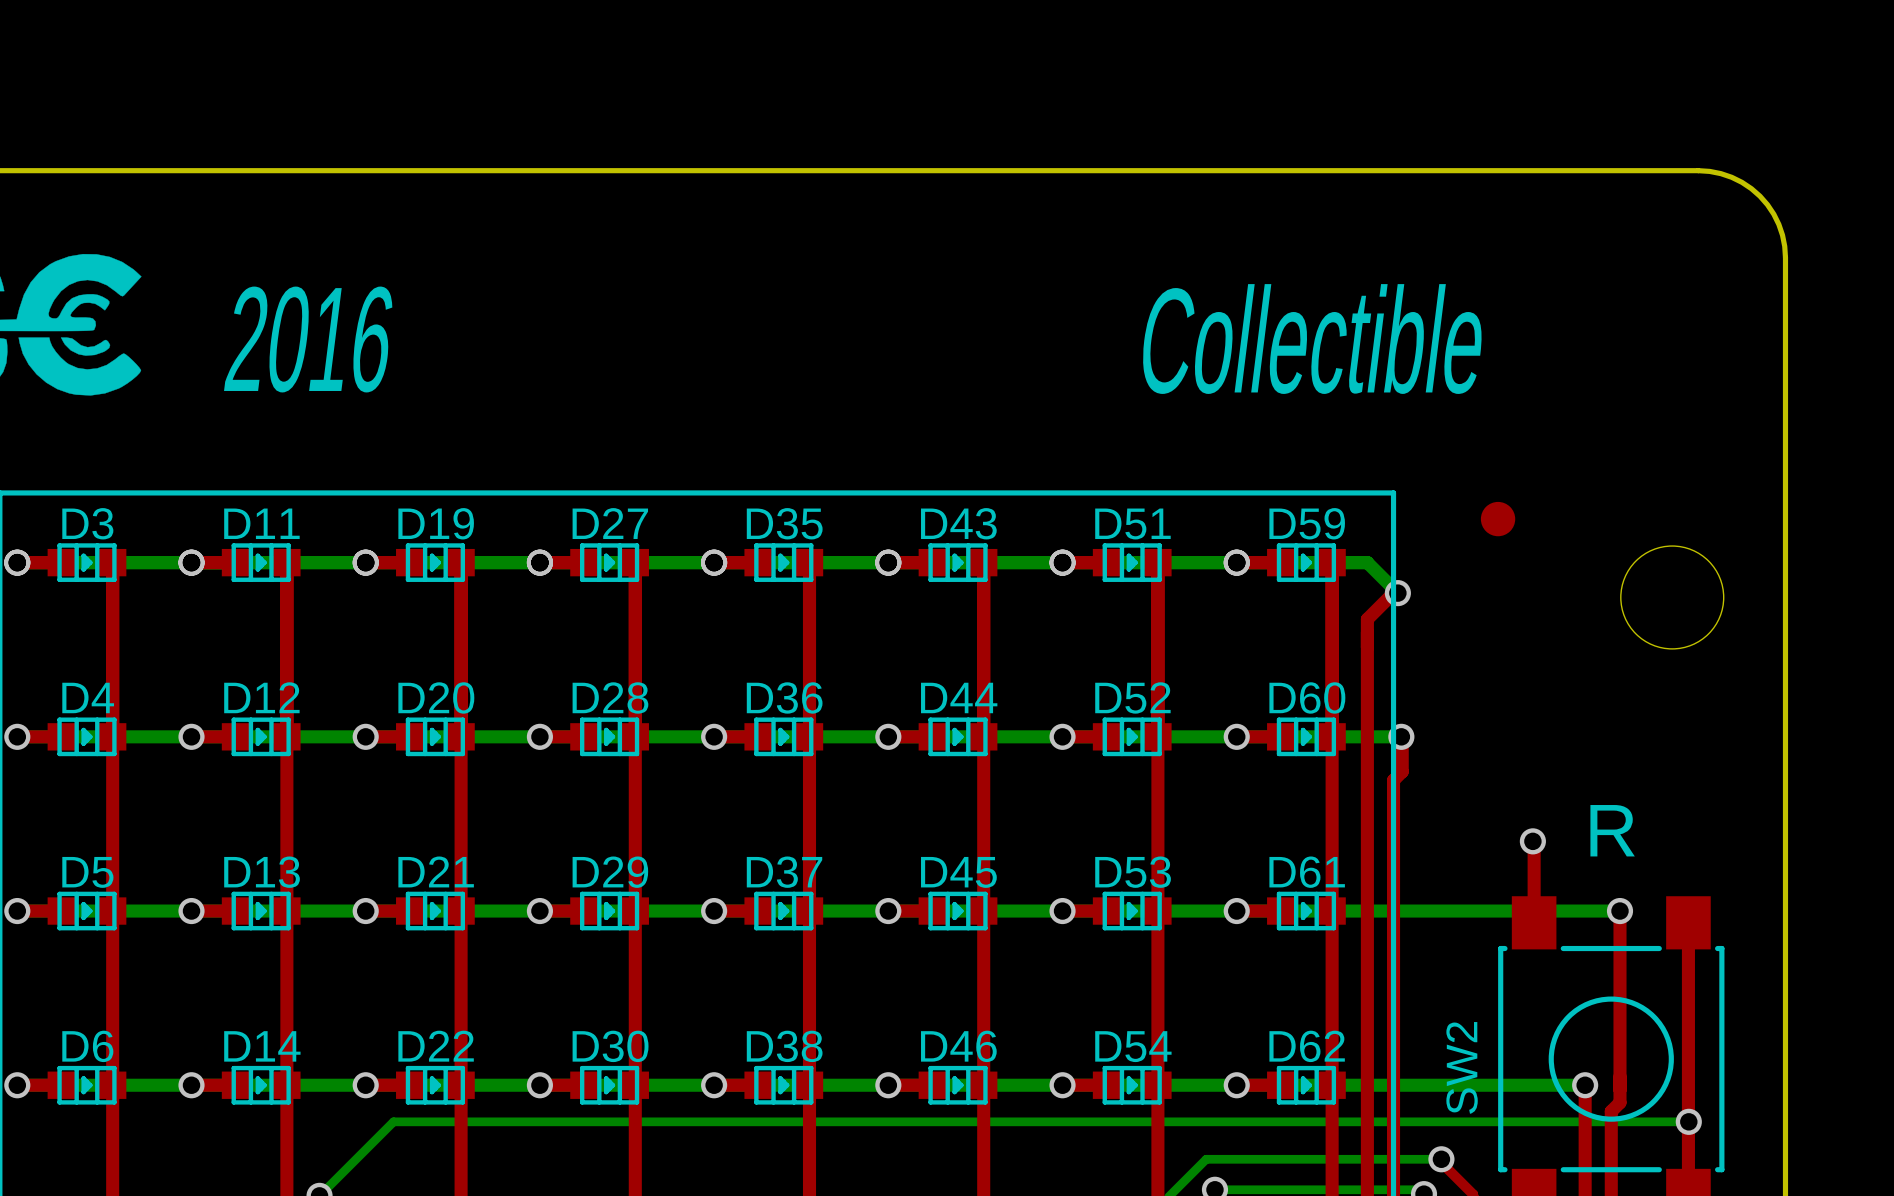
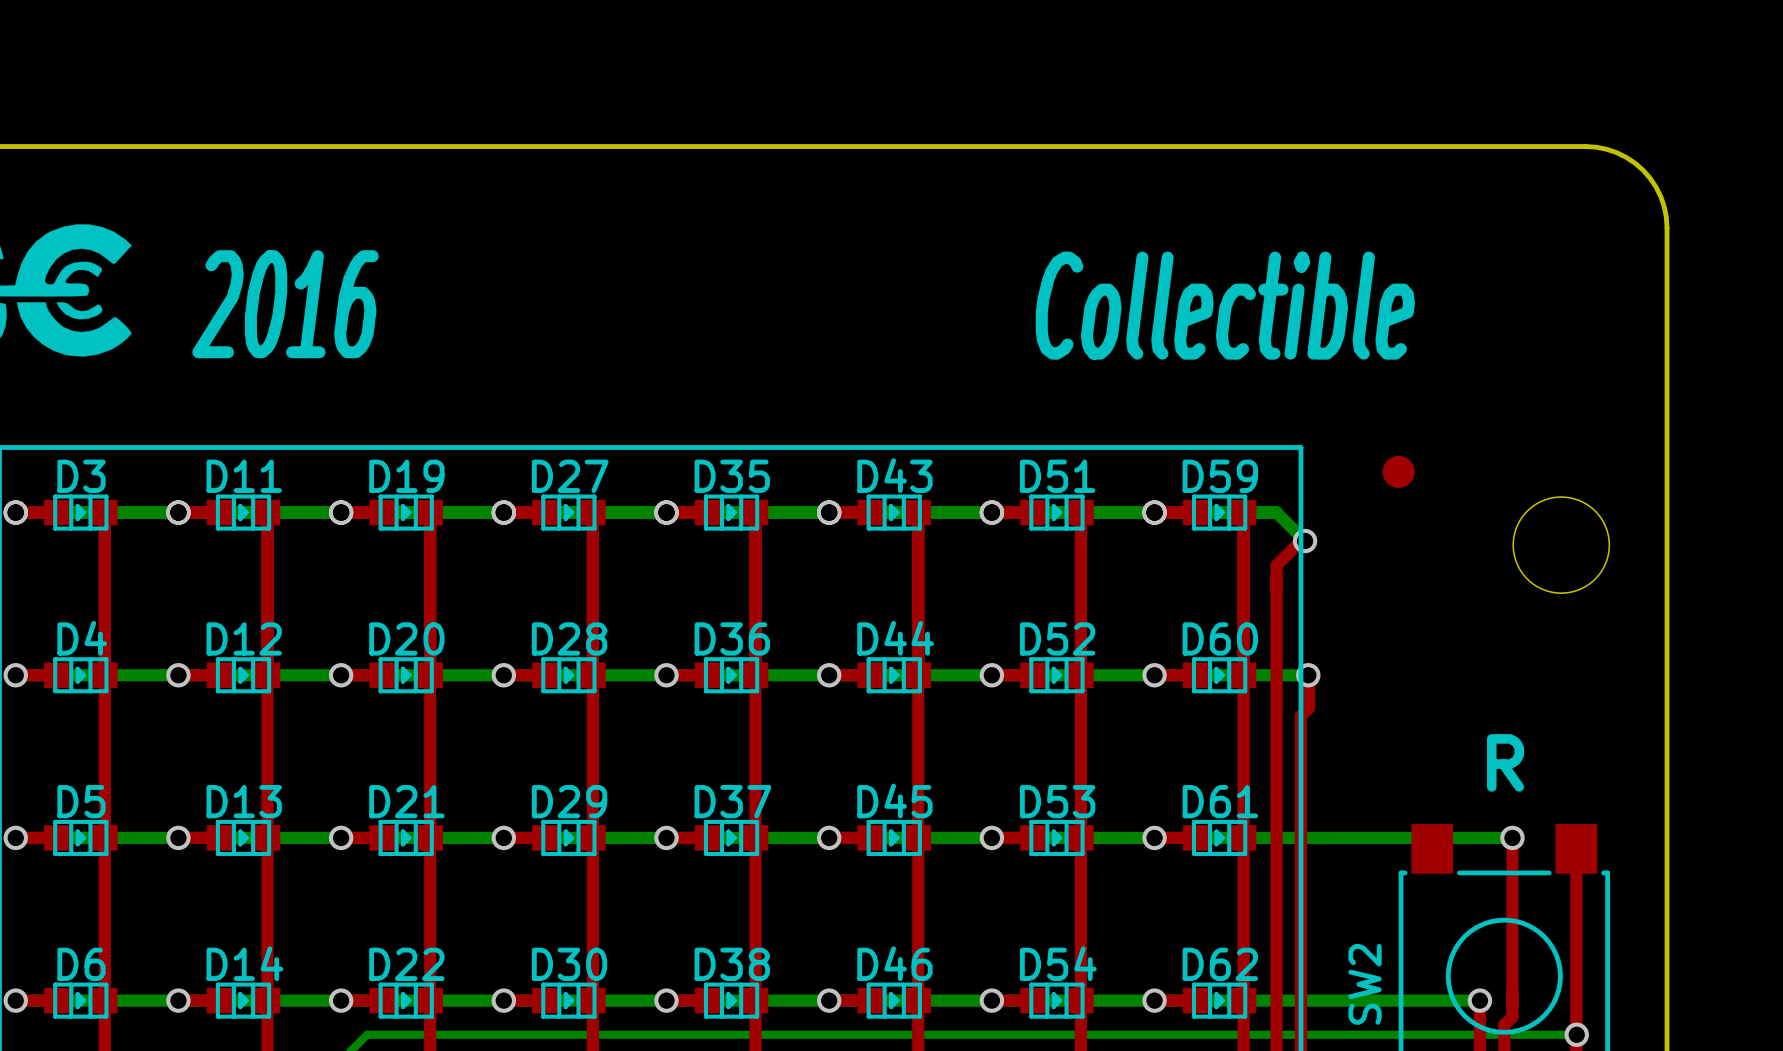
top track: (1532, 841) (1534, 922) -> none
via: (1532, 841) -> none

